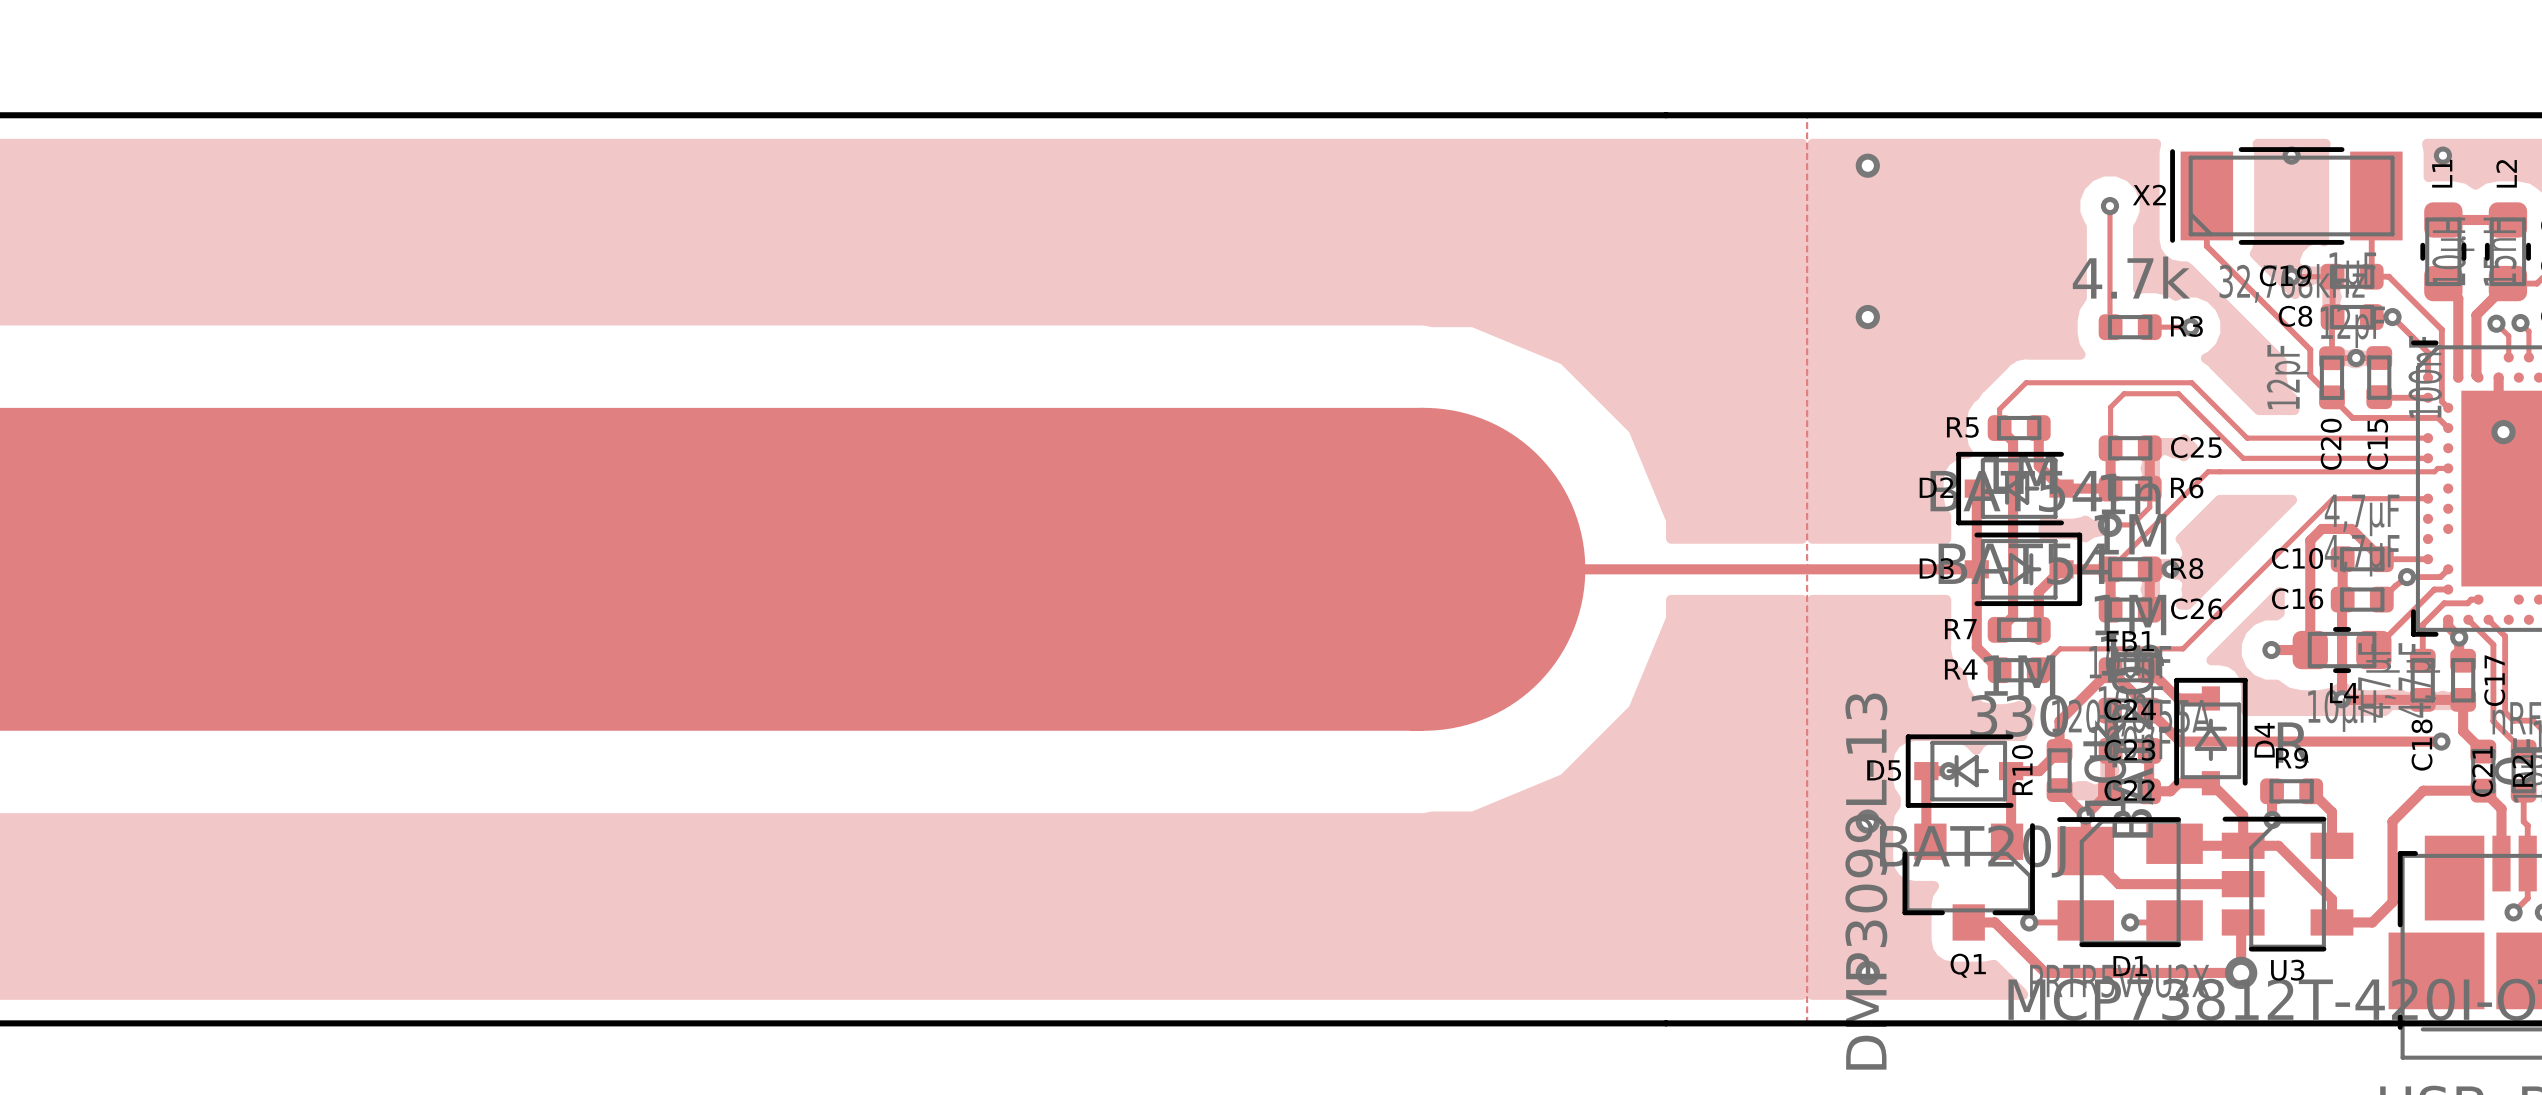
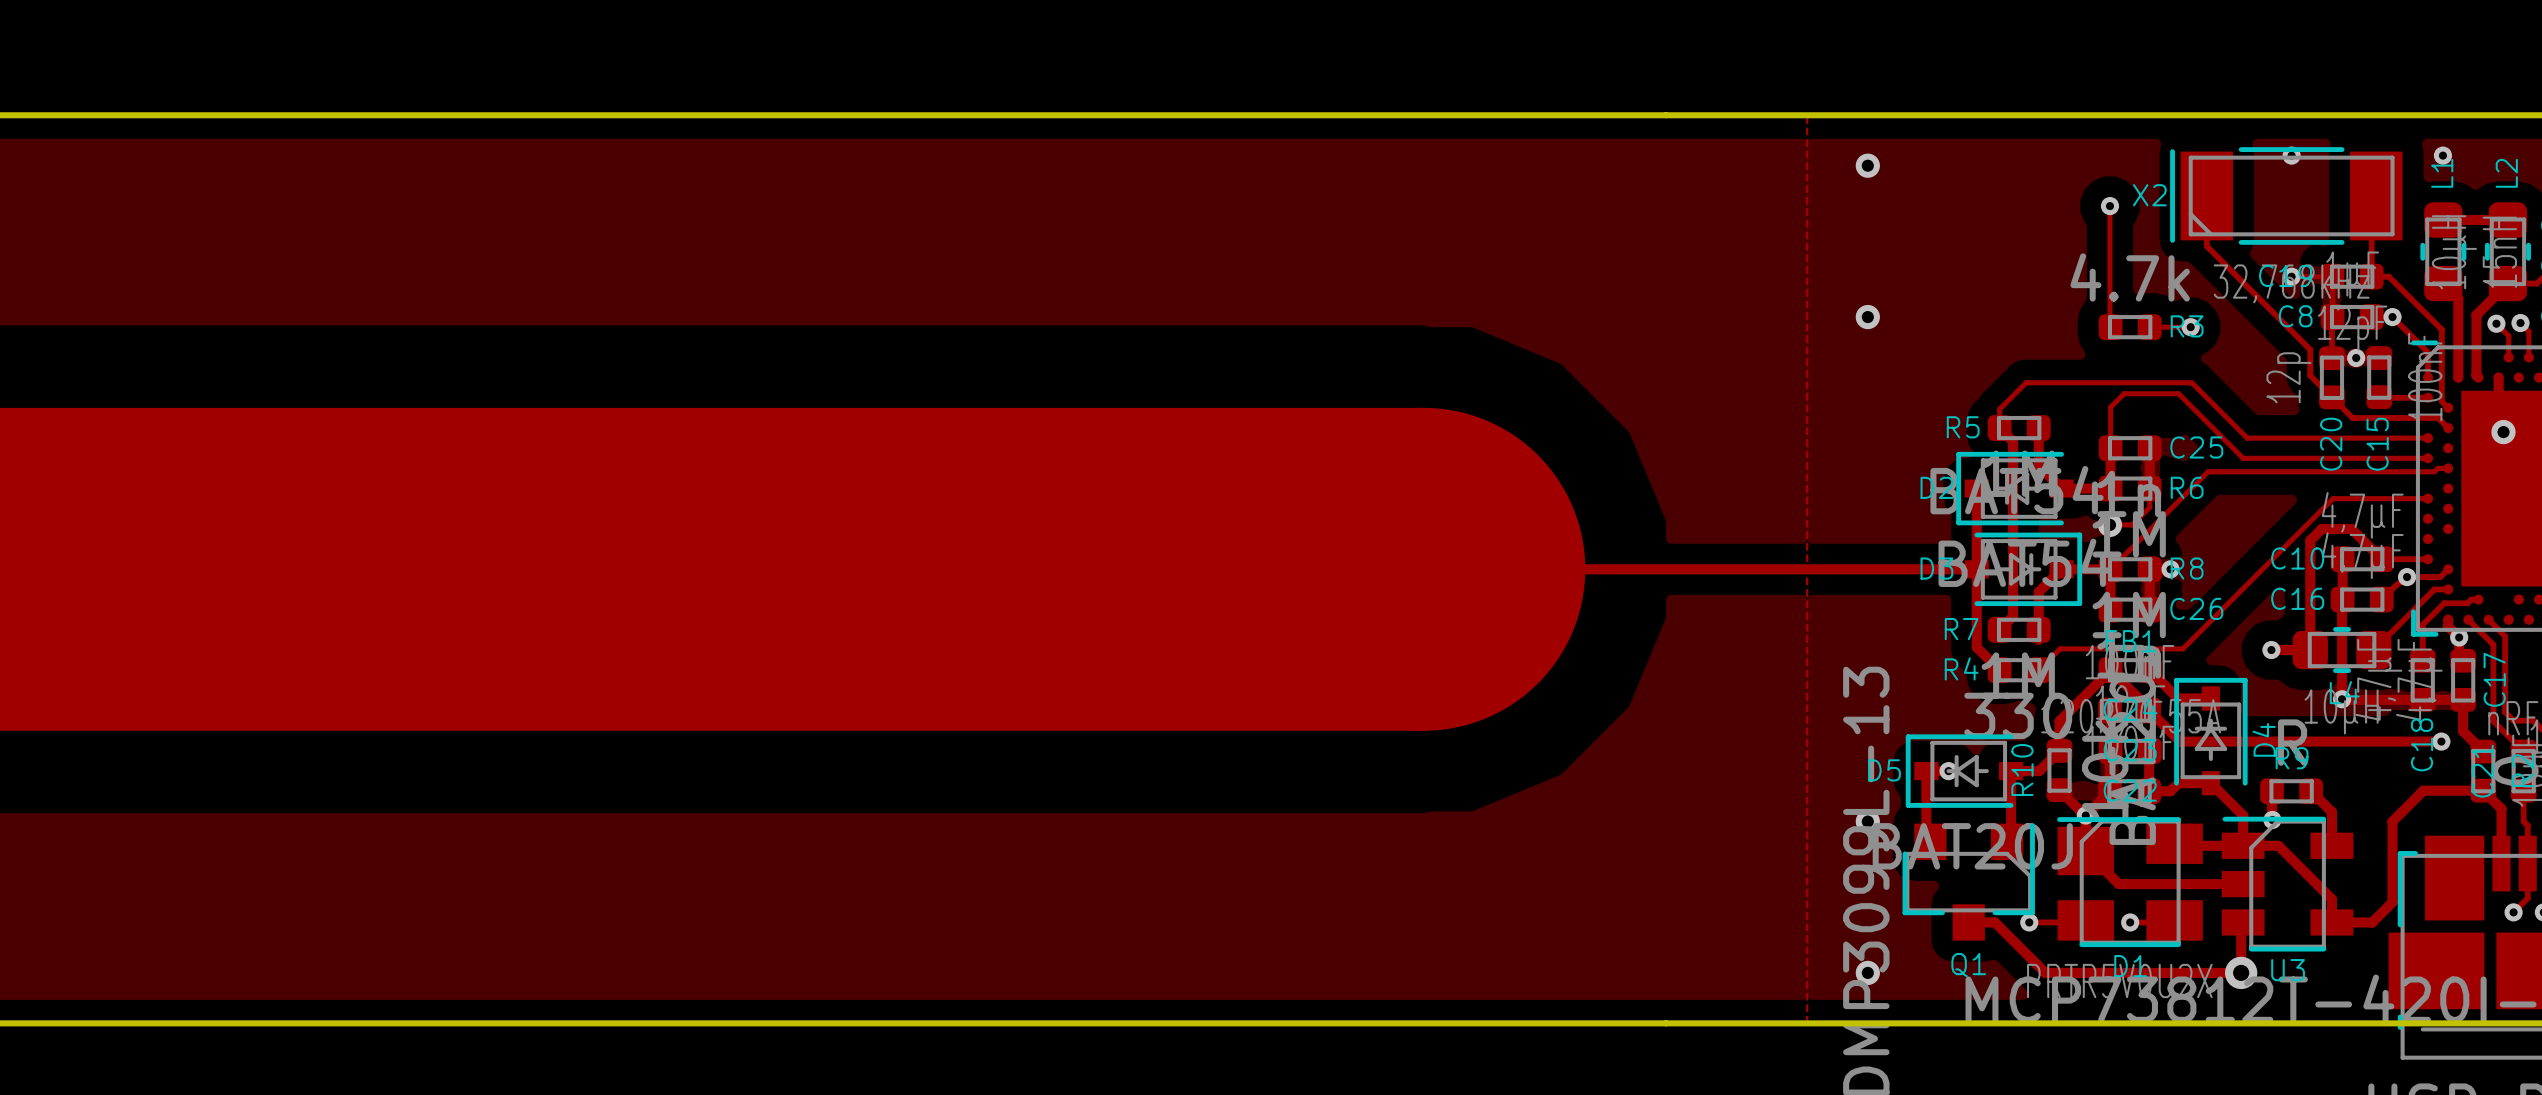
C20 value: 12pF (2287, 377) -> 12p (2288, 377)

